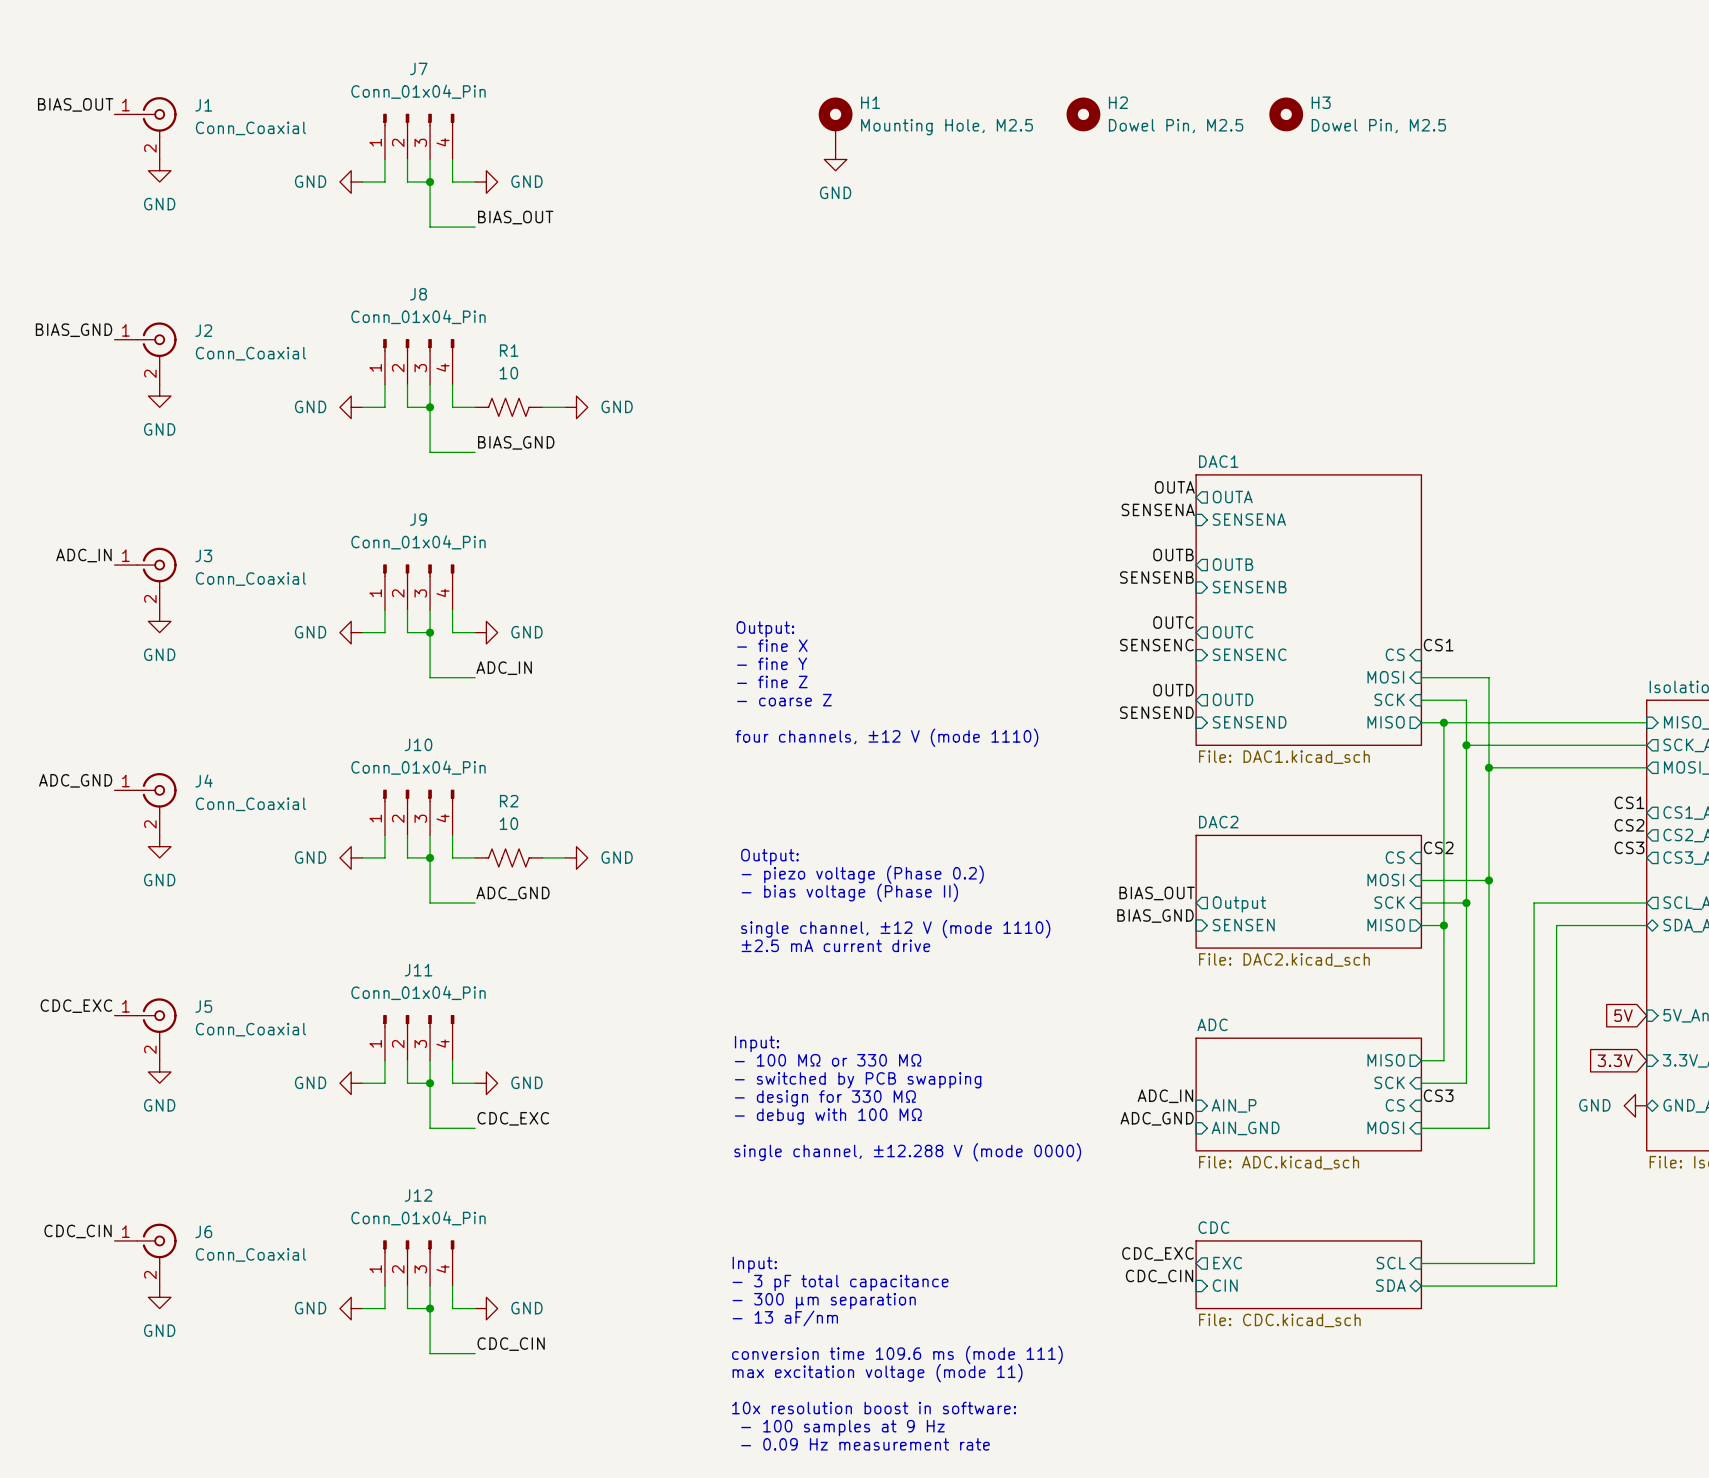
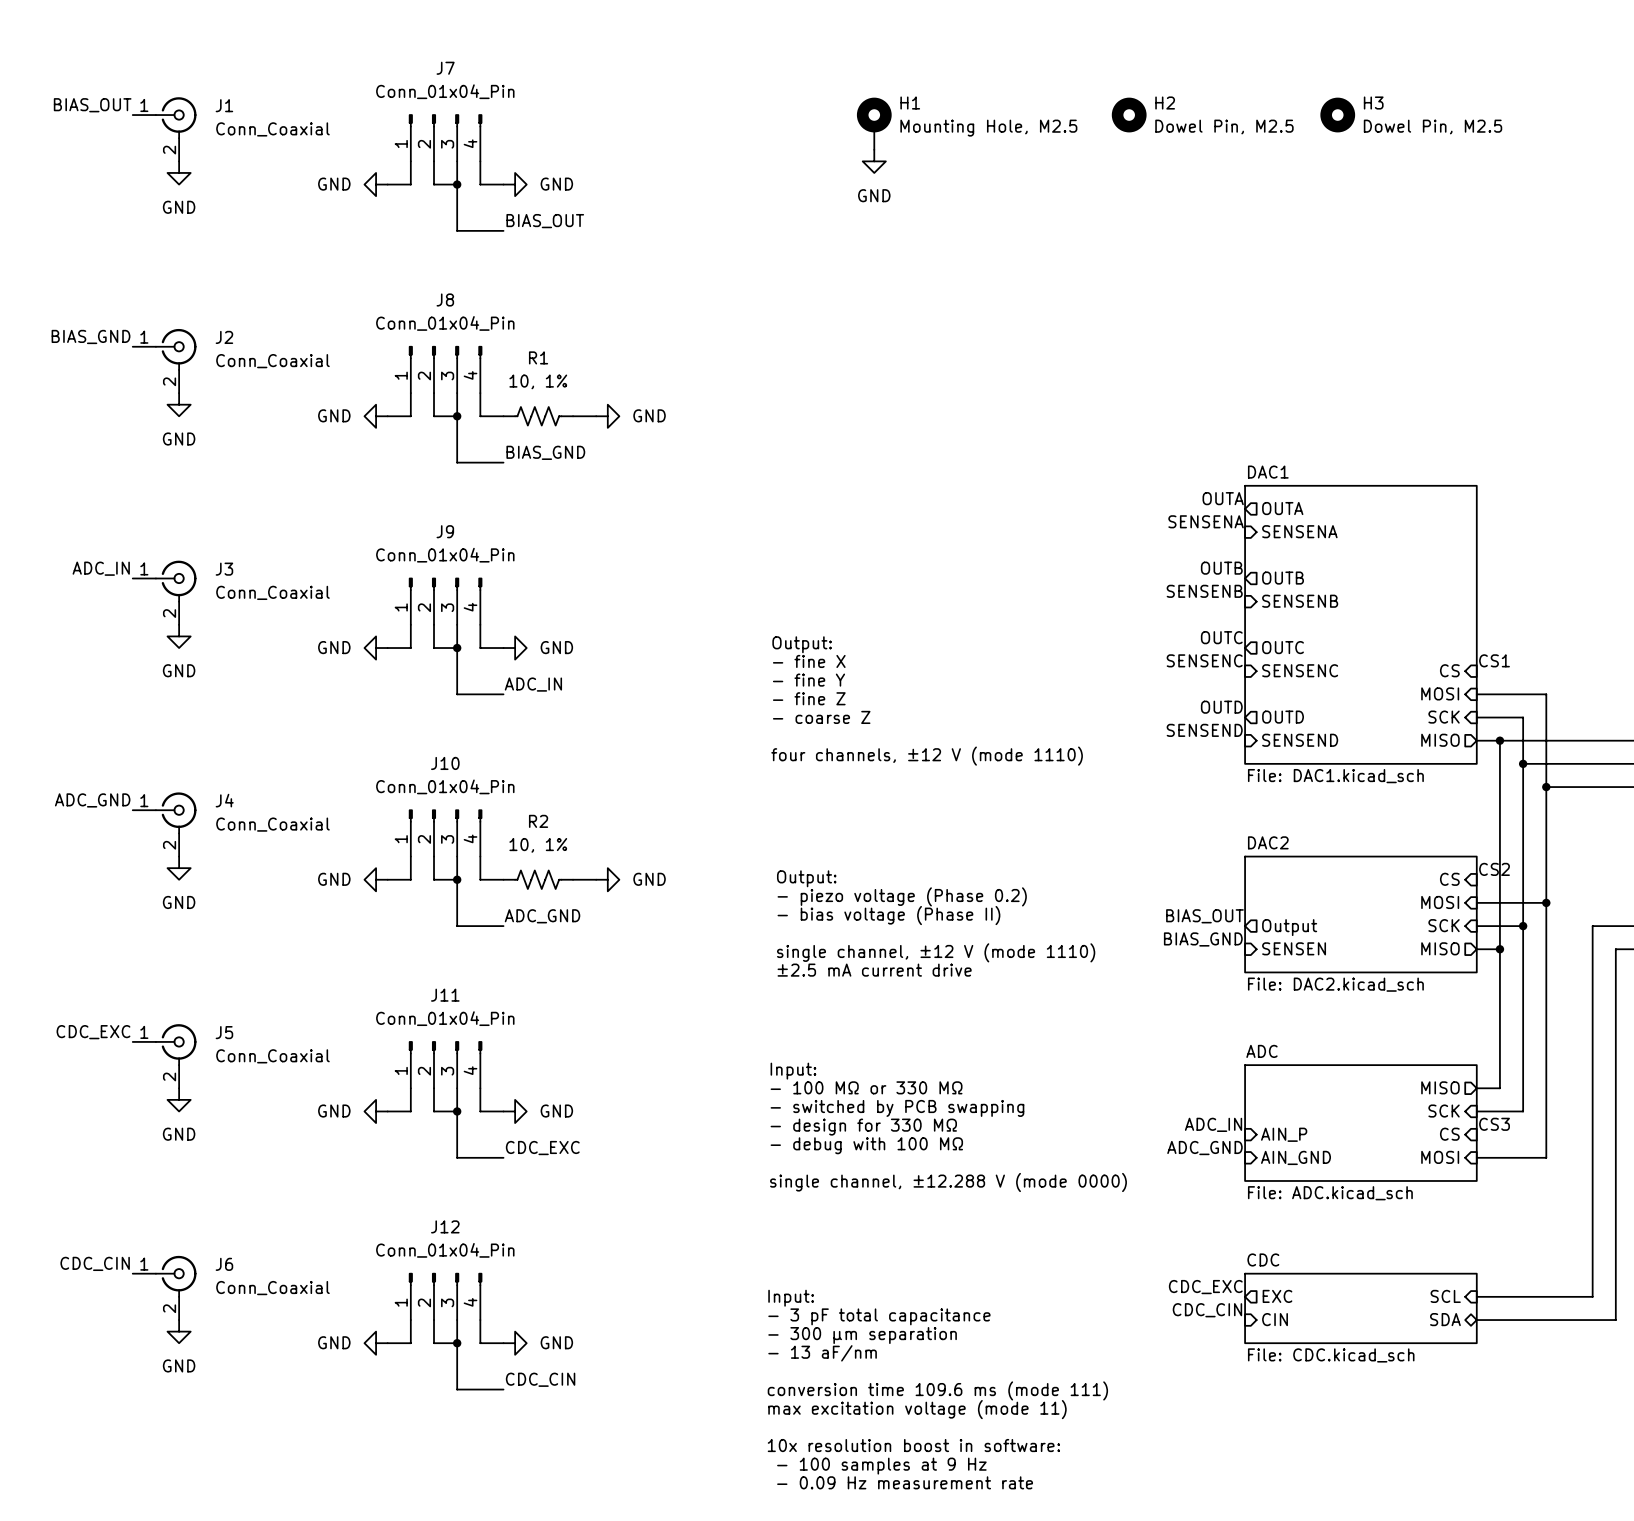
R1 value: 10 (508, 373) -> 10, 1% (538, 381)
R2 value: 10 (508, 823) -> 10, 1% (538, 845)

